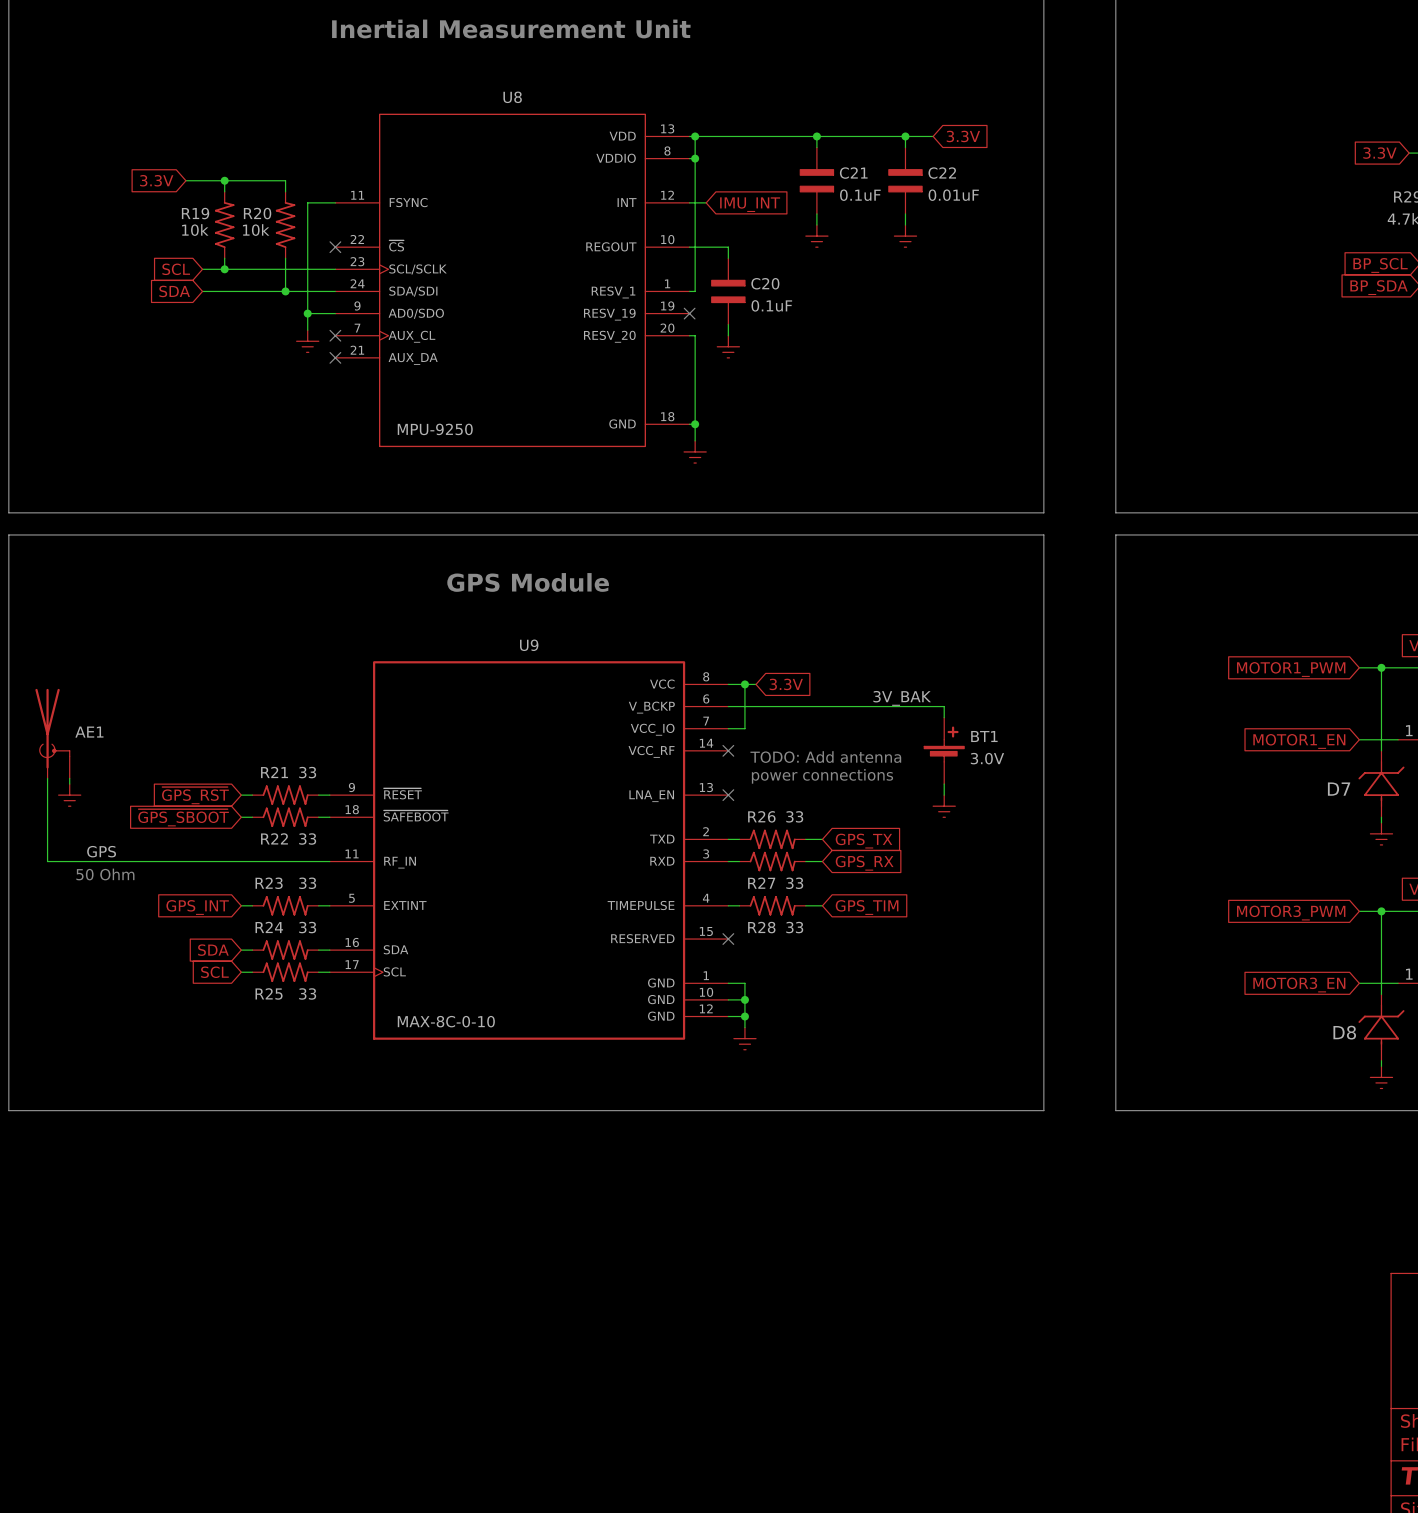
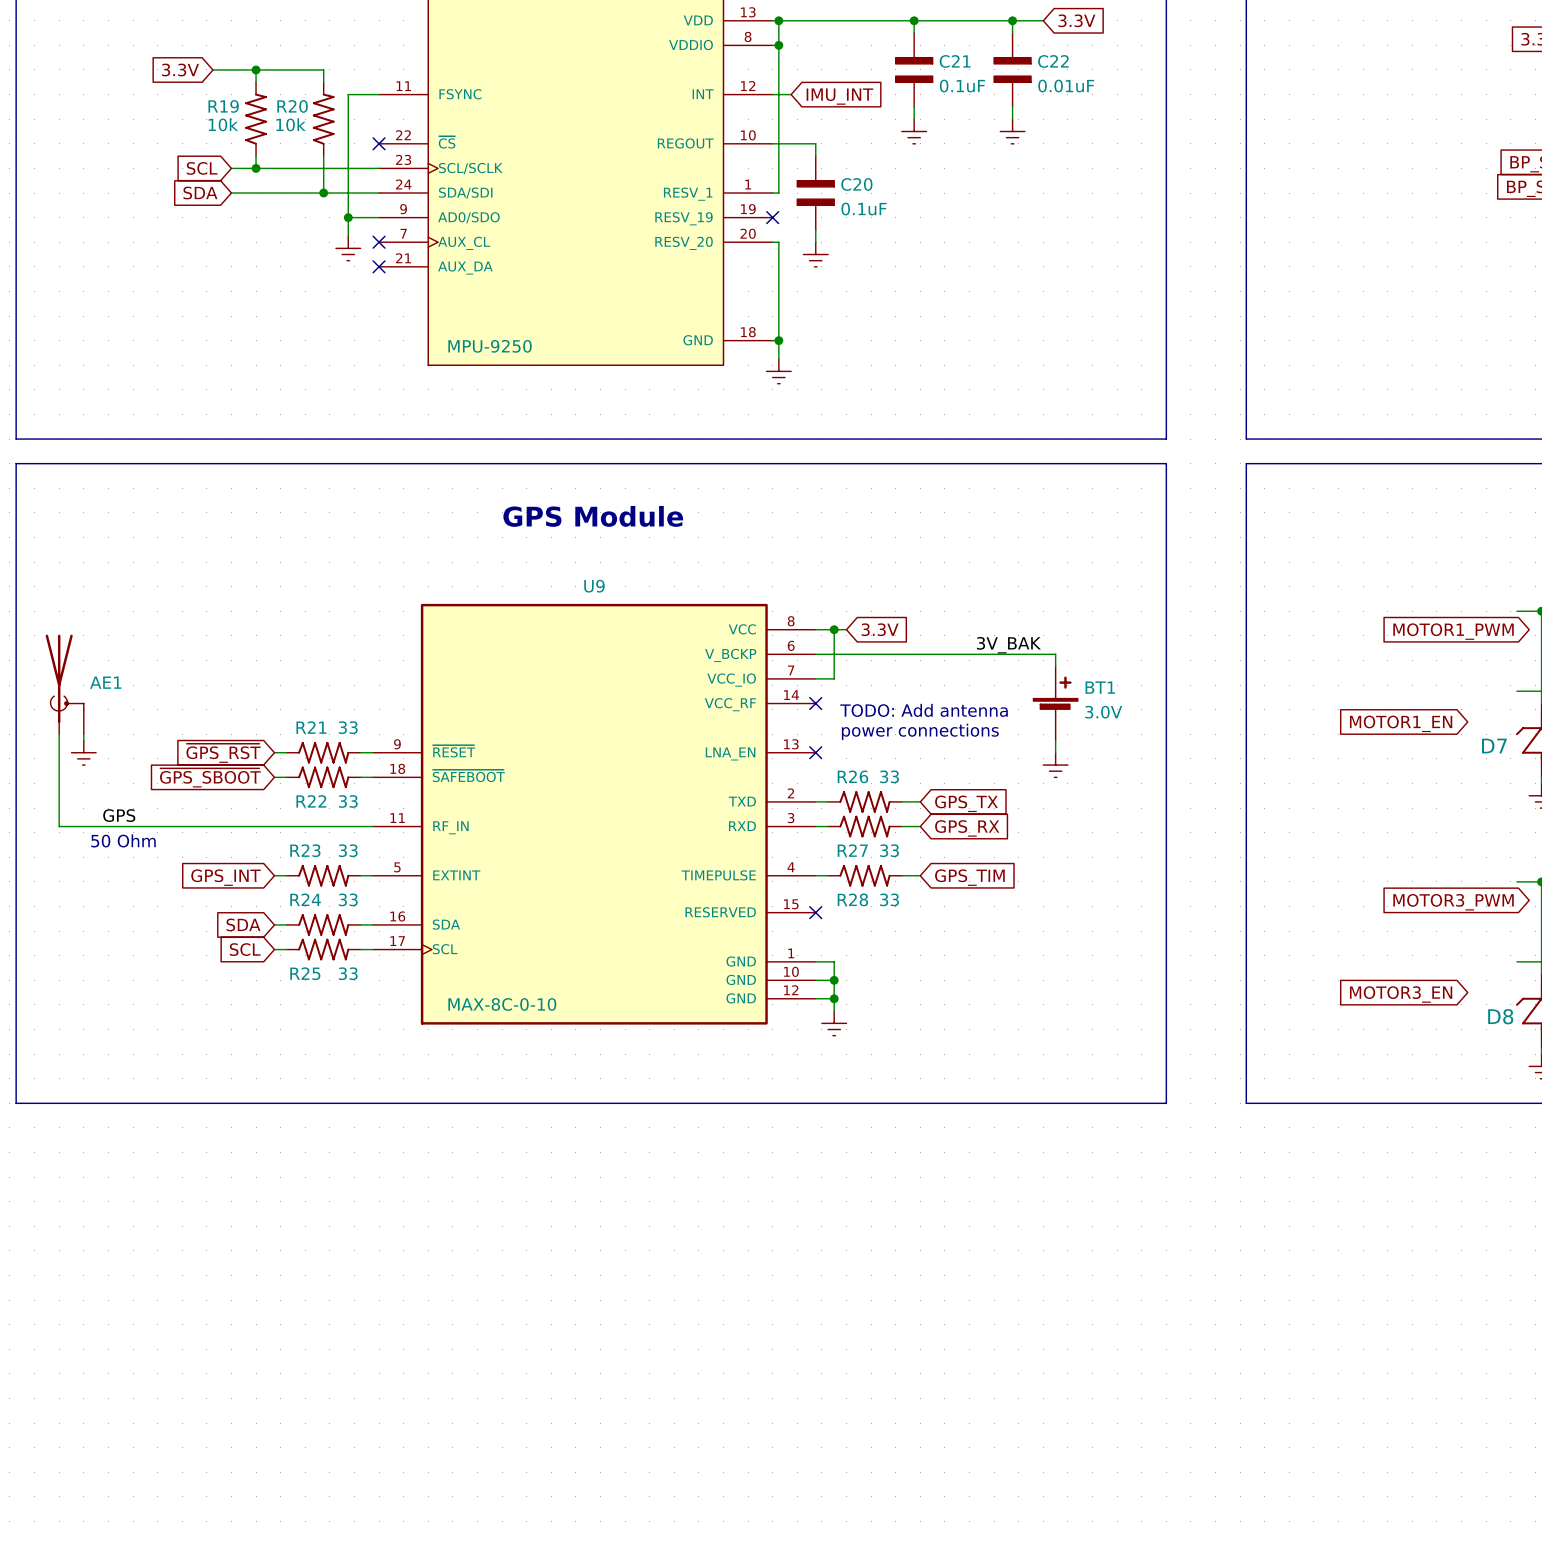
global label position: MOTOR1_PWM (1291, 669) -> MOTOR1_PWM (1453, 631)
global label position: MOTOR1_EN (1299, 741) -> MOTOR1_EN (1401, 723)
global label position: MOTOR3_PWM (1291, 913) -> MOTOR3_PWM (1453, 902)
global label position: MOTOR3_EN (1299, 985) -> MOTOR3_EN (1401, 994)

